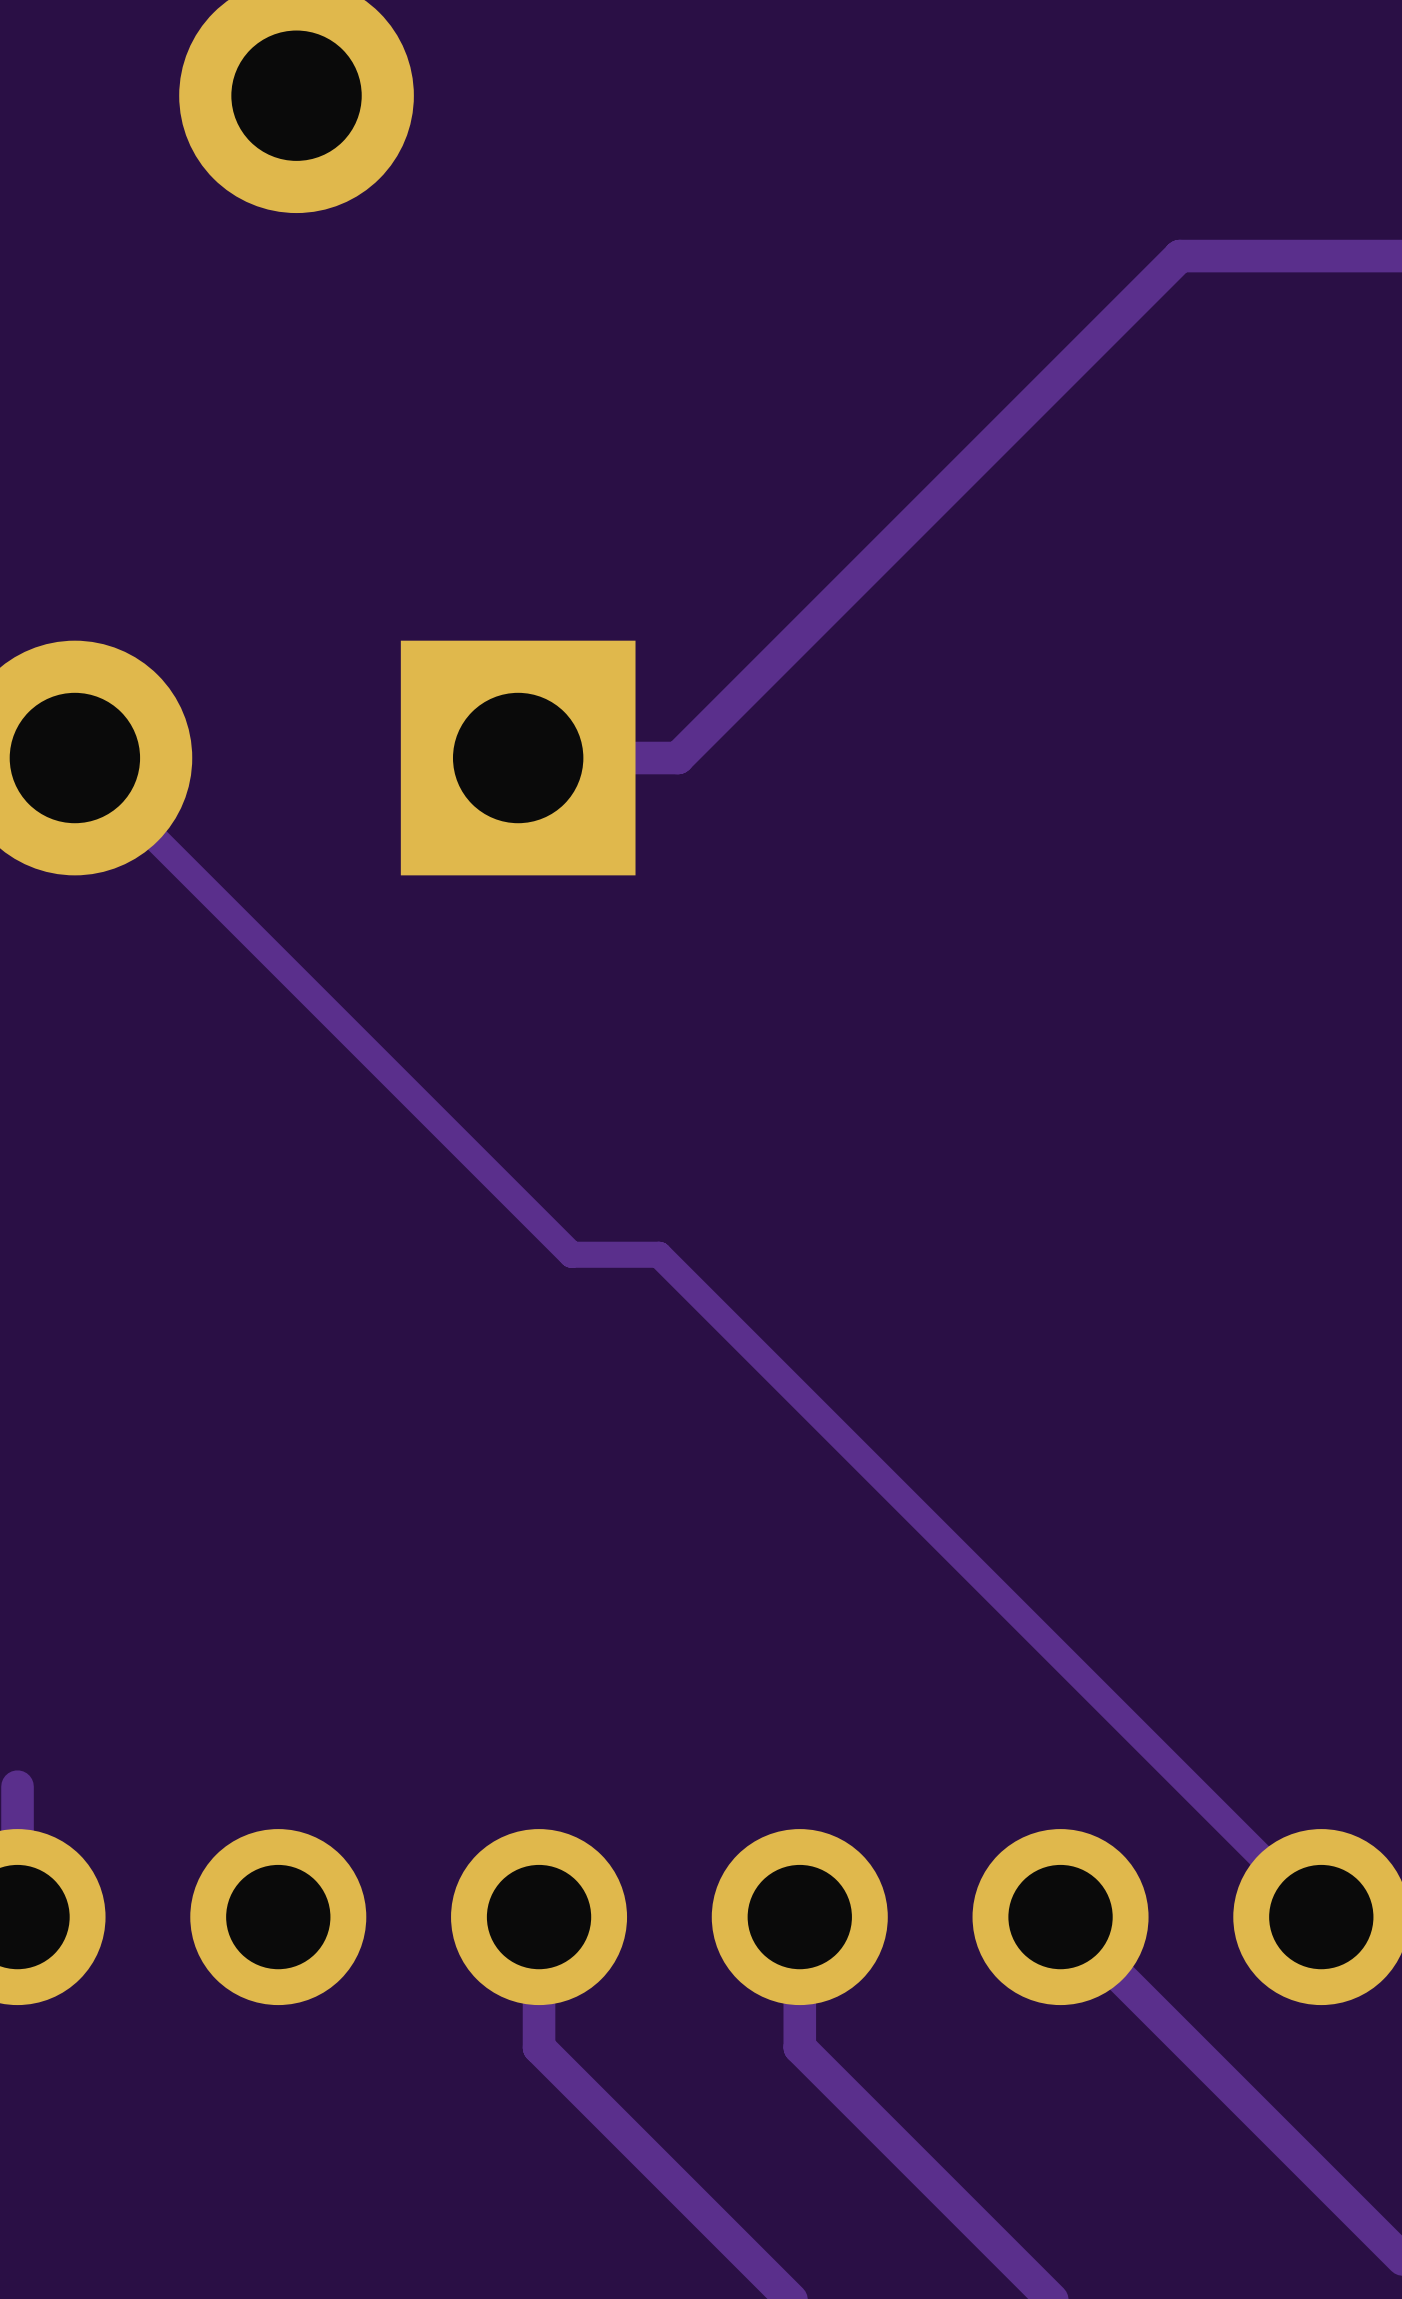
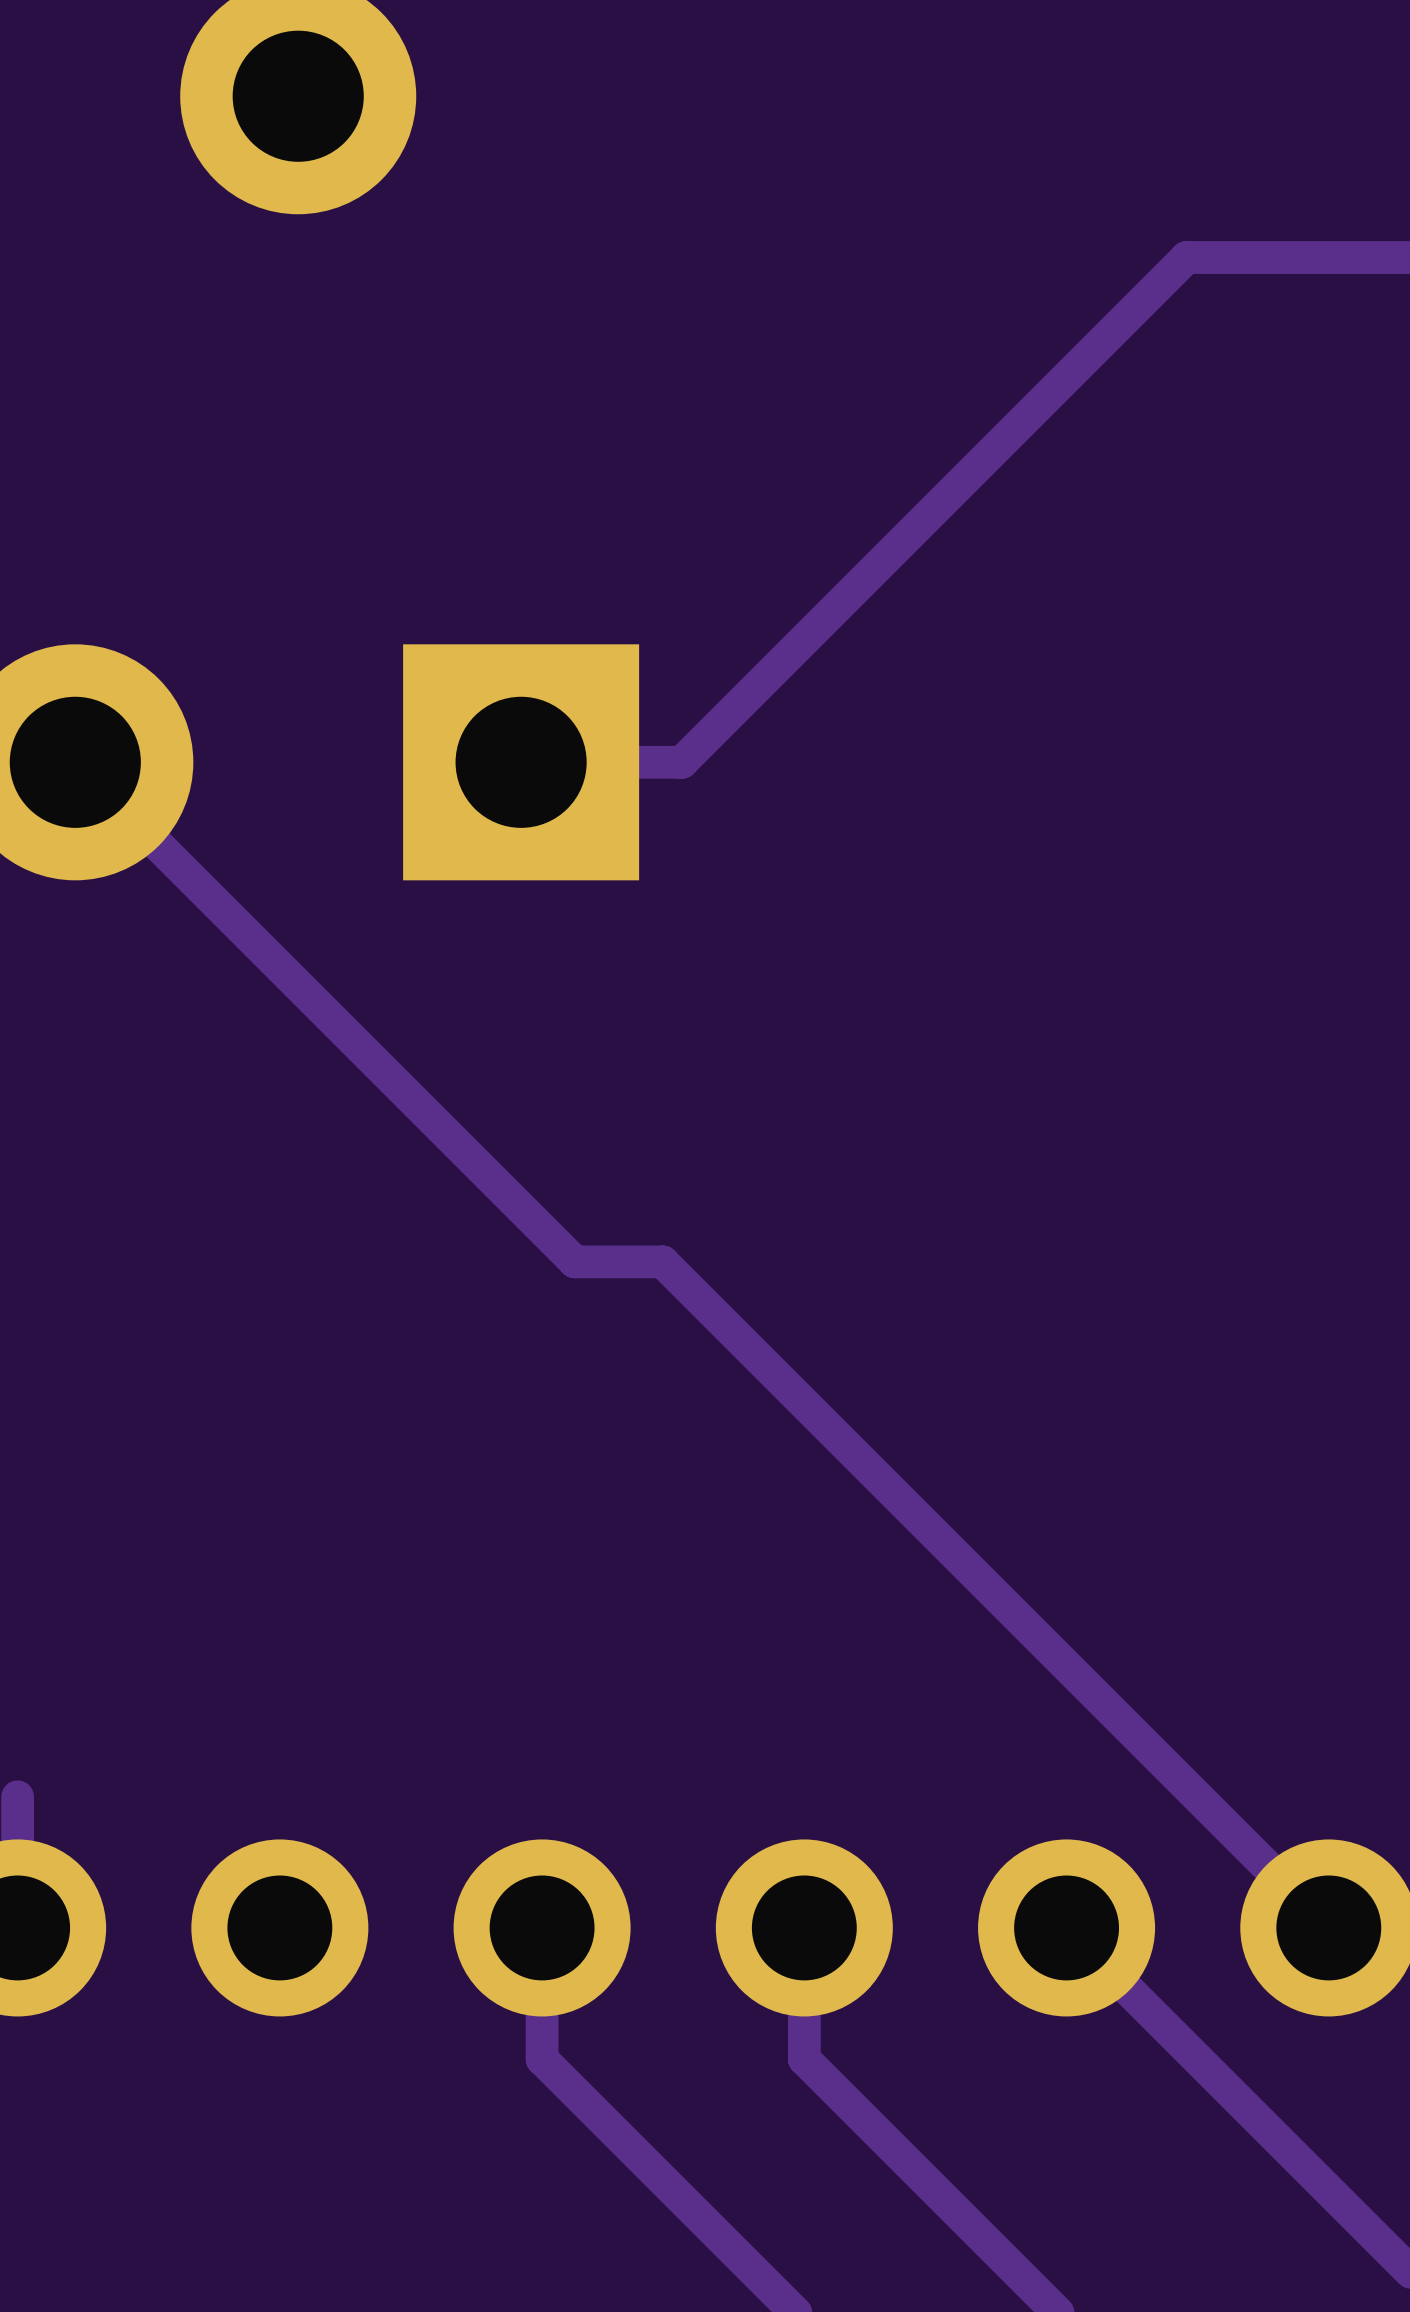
track width: thin (74, 758) (571, 1254) (658, 1254) (1321, 1917) -> thick (75, 762) (574, 1261) (662, 1261) (1328, 1927)

